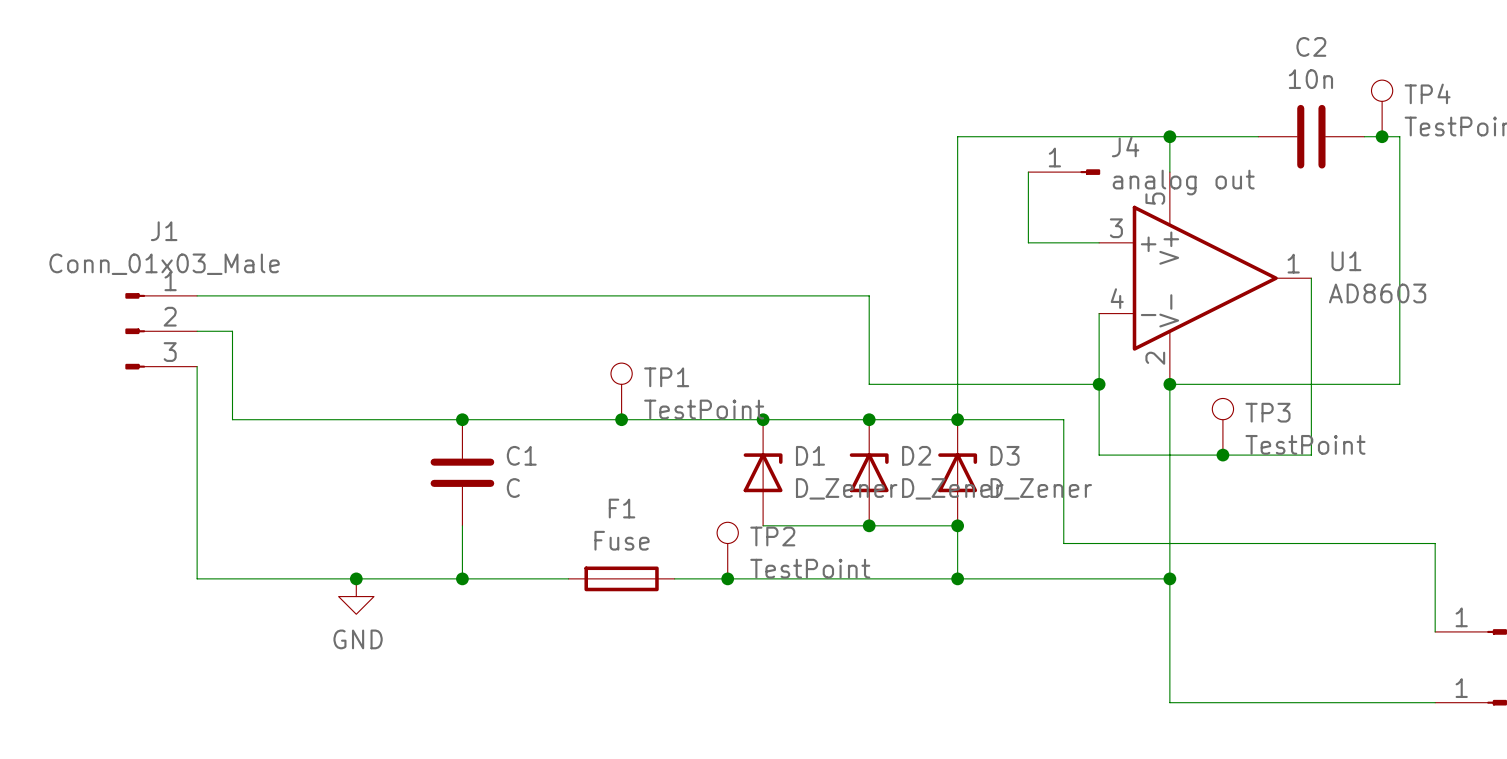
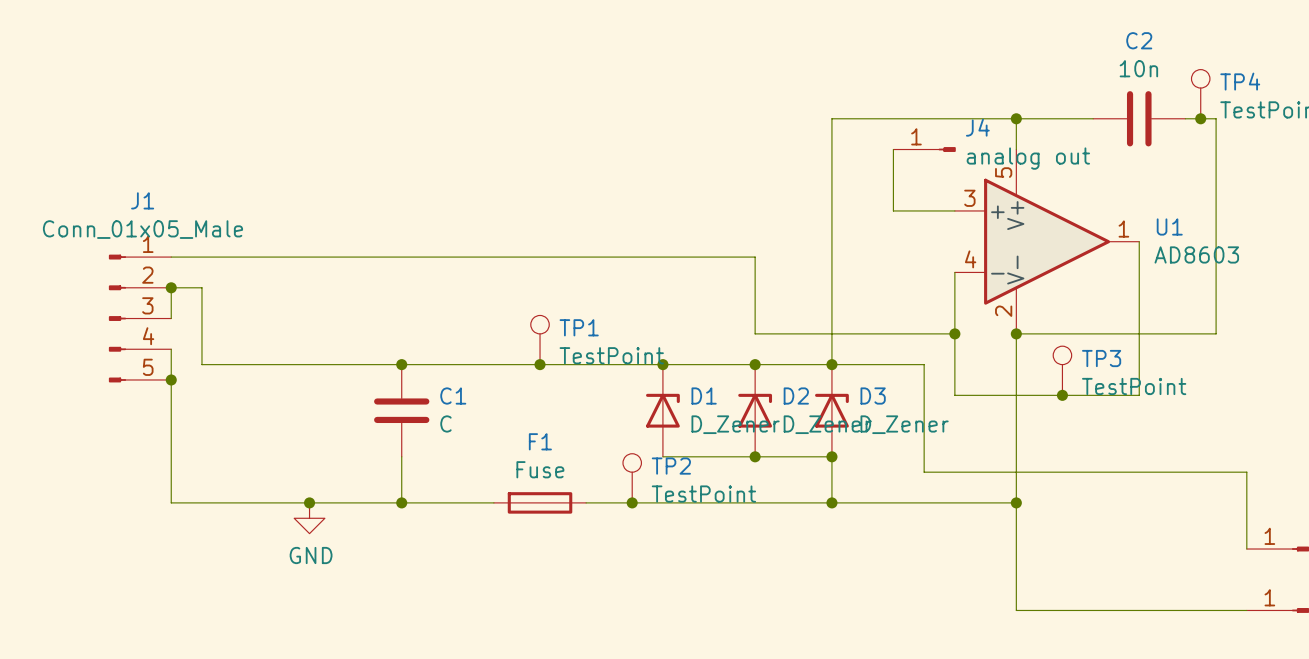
J1 value: Conn_01x03_Male (164, 264) -> Conn_01x05_Male (142, 229)
J1 symbol: [125, 293, 198, 370] -> [108, 254, 172, 383]
junction: none -> (171, 287)
wire: (197, 366) (197, 402) -> (171, 318) (171, 287)
junction: none -> (171, 379)

